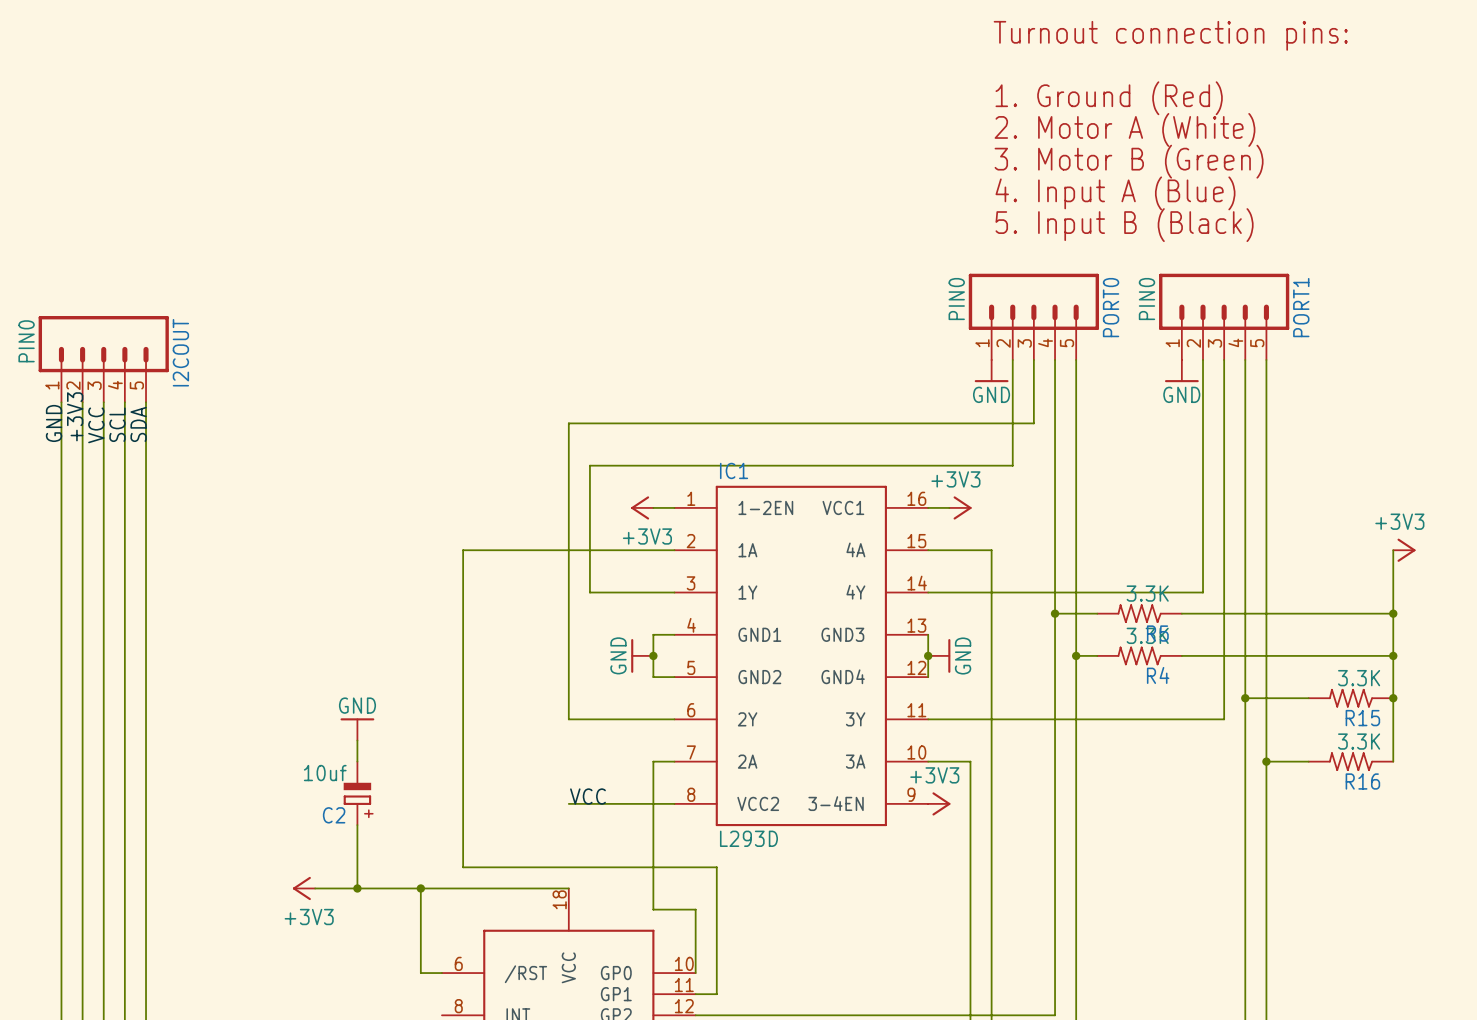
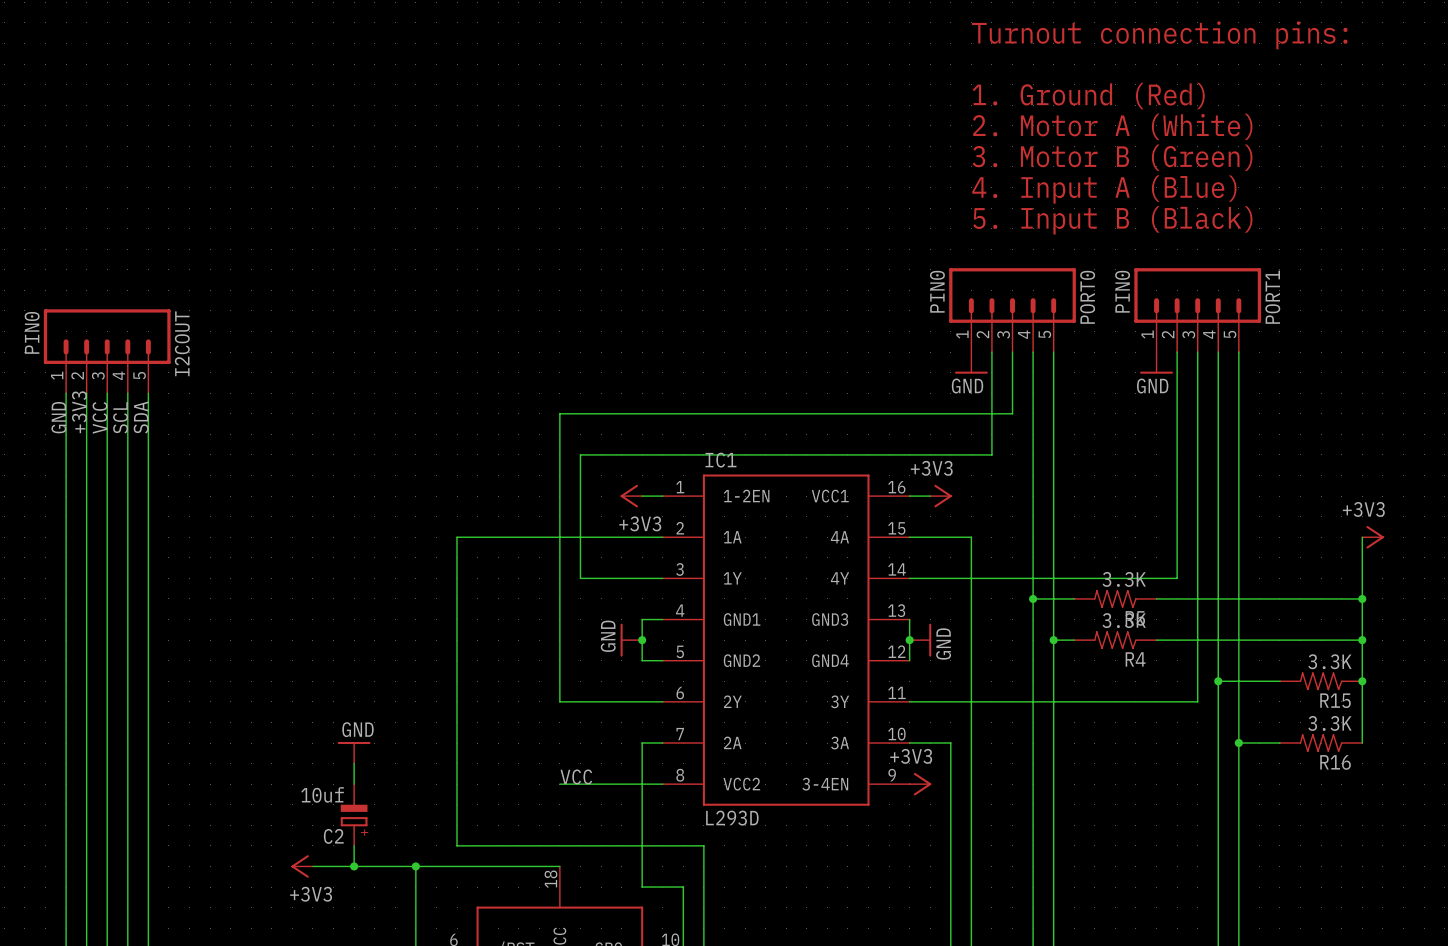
power symbol position: GND (357, 729) -> GND (354, 752)
C2 position: (357, 793) -> (354, 815)

